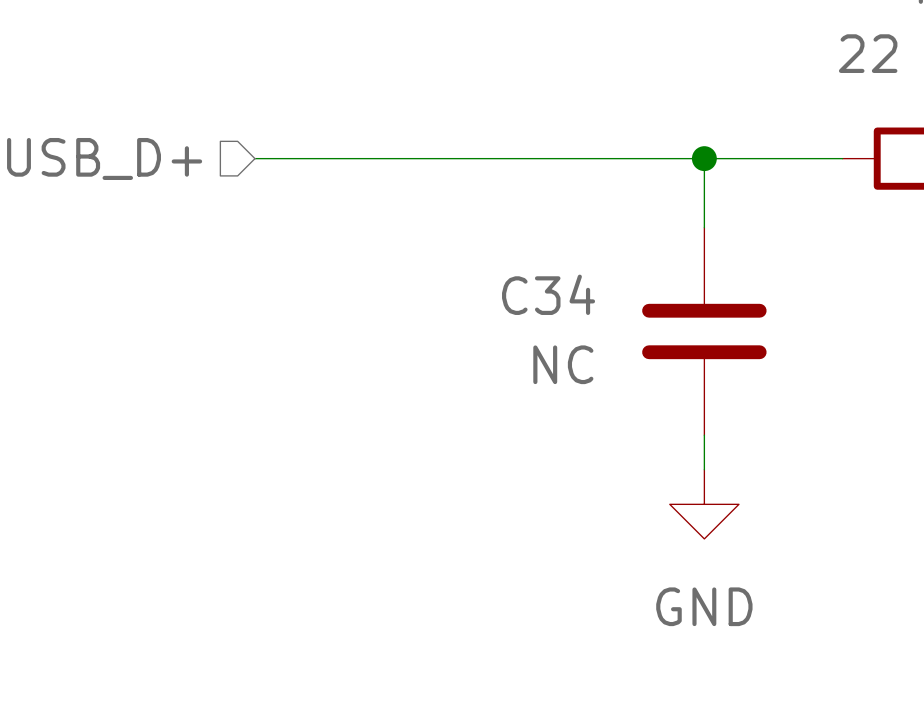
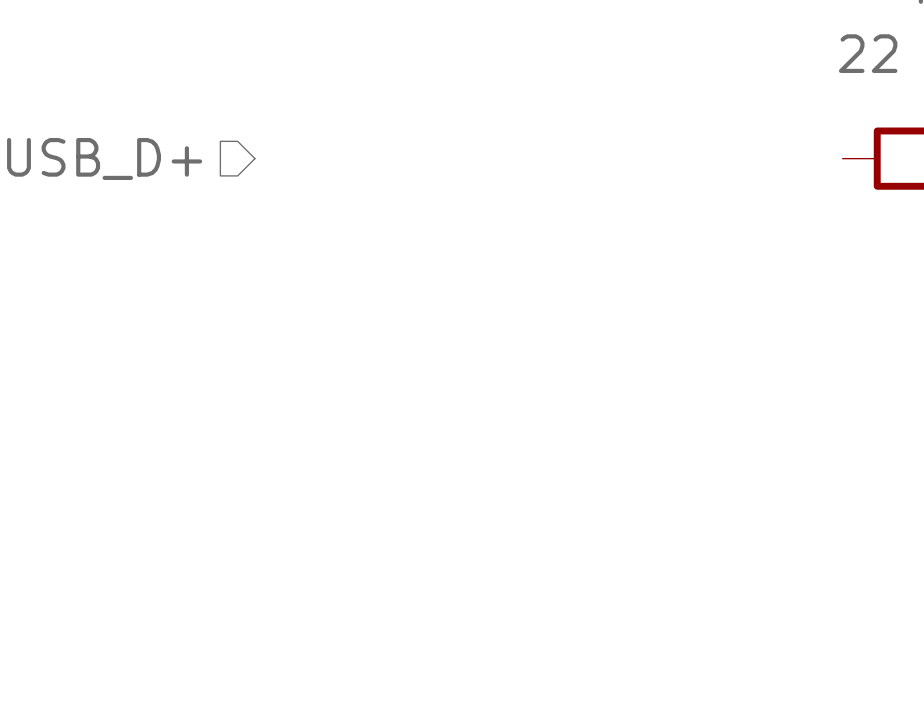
wire: (254, 158) (842, 158) -> none
wire: (704, 158) (704, 227) -> none
junction: (704, 158) -> none
C34: NC (704, 331) -> none
wire: (704, 435) (704, 469) -> none
power symbol: GND (704, 504) -> none

